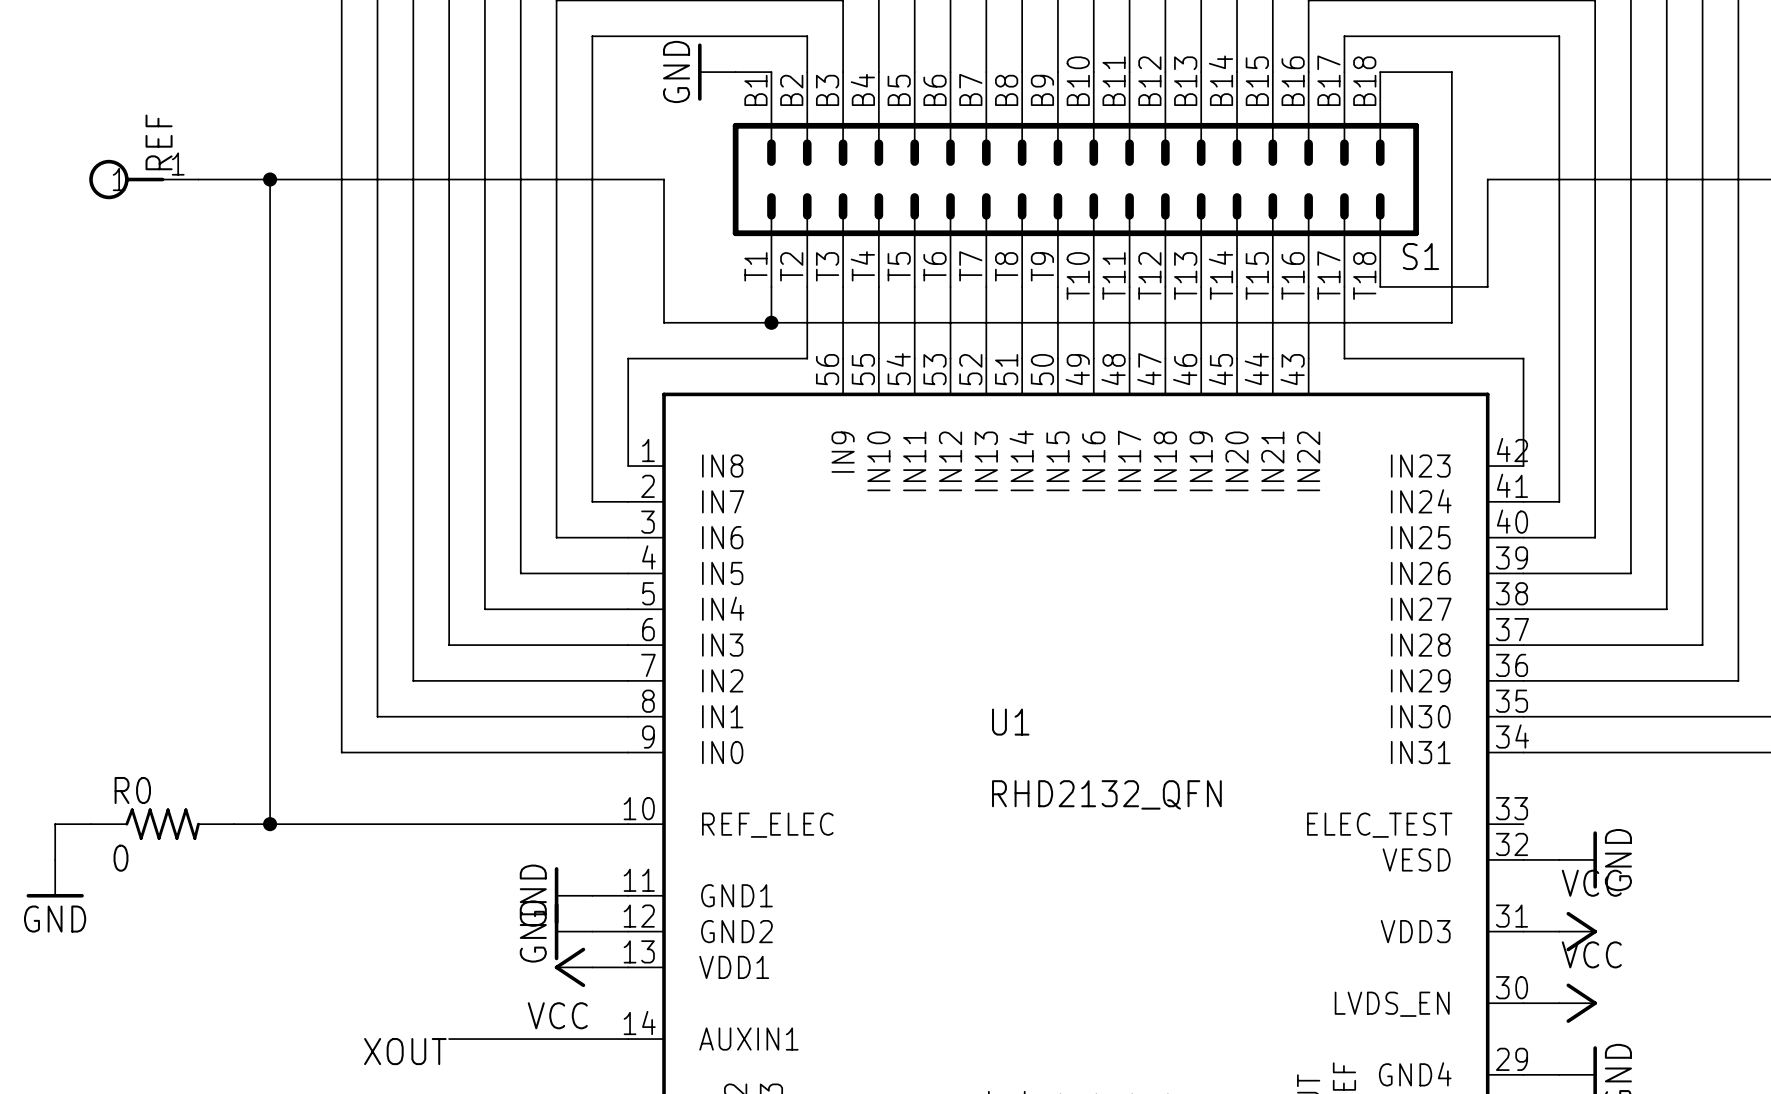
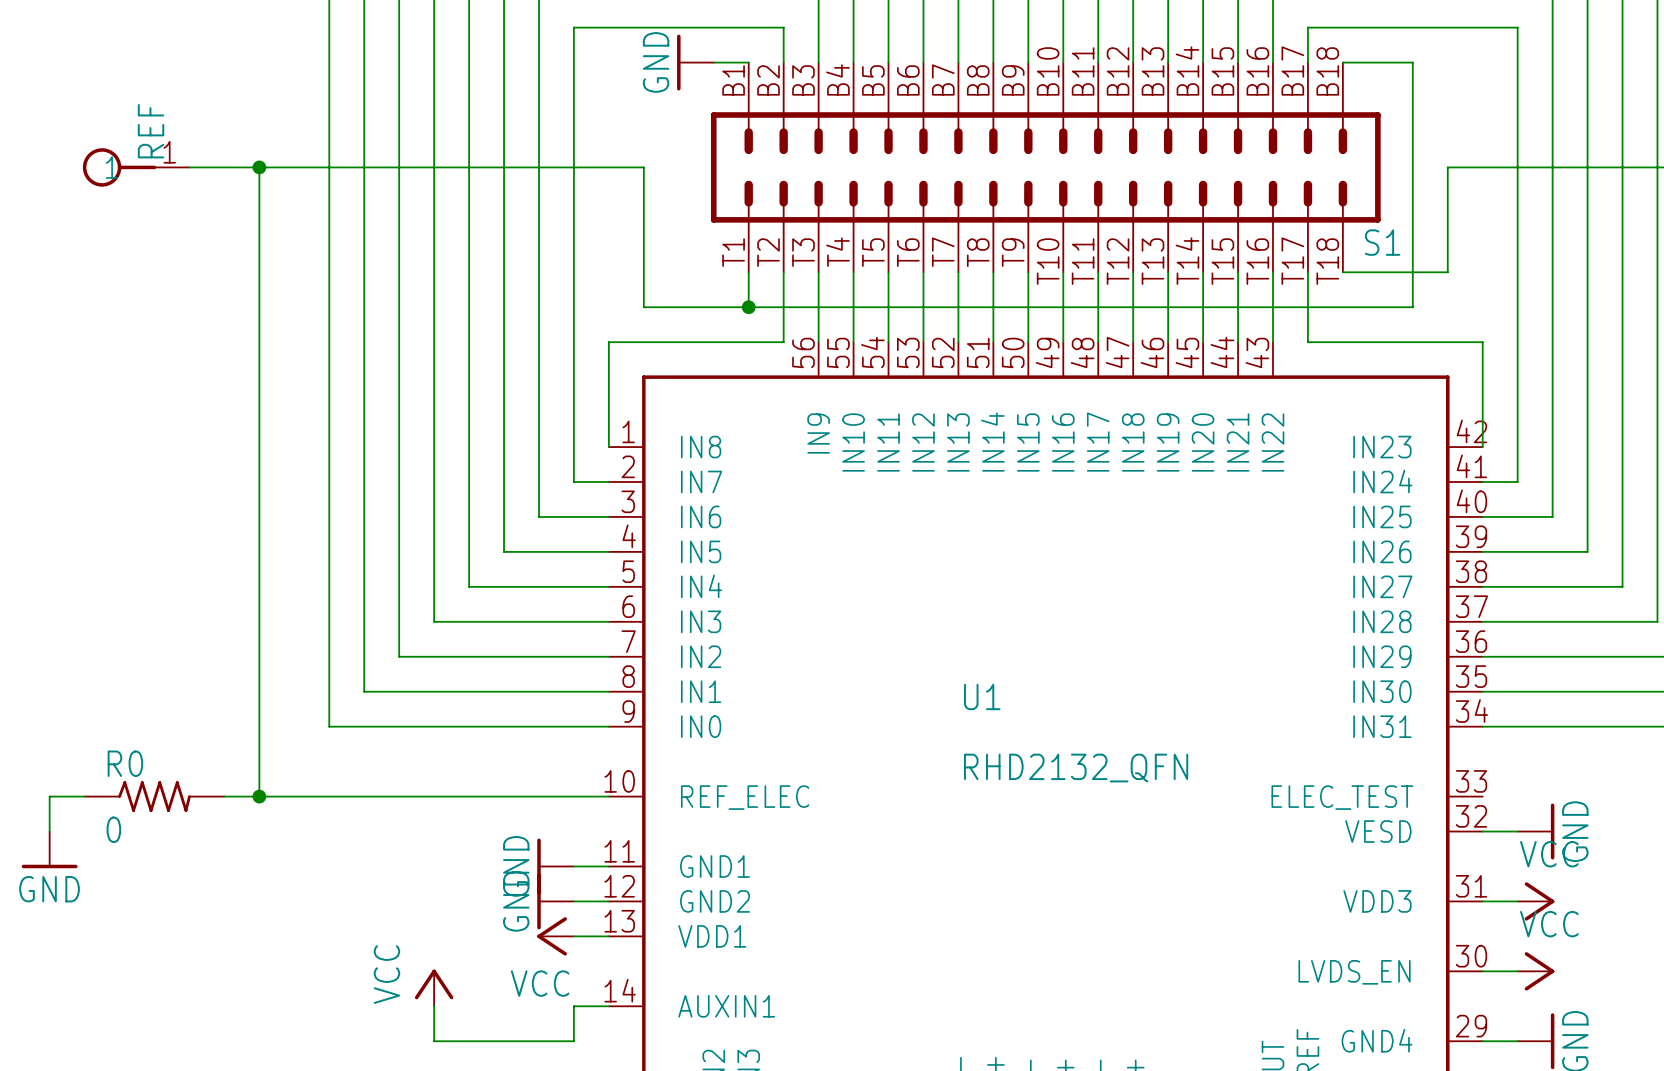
power symbol: none -> VCC (434, 987)
wire: (449, 1039) (592, 1039) -> (434, 1006) (434, 1041) (573, 1041) (573, 1006)
label: XOUT (405, 1051) -> none

